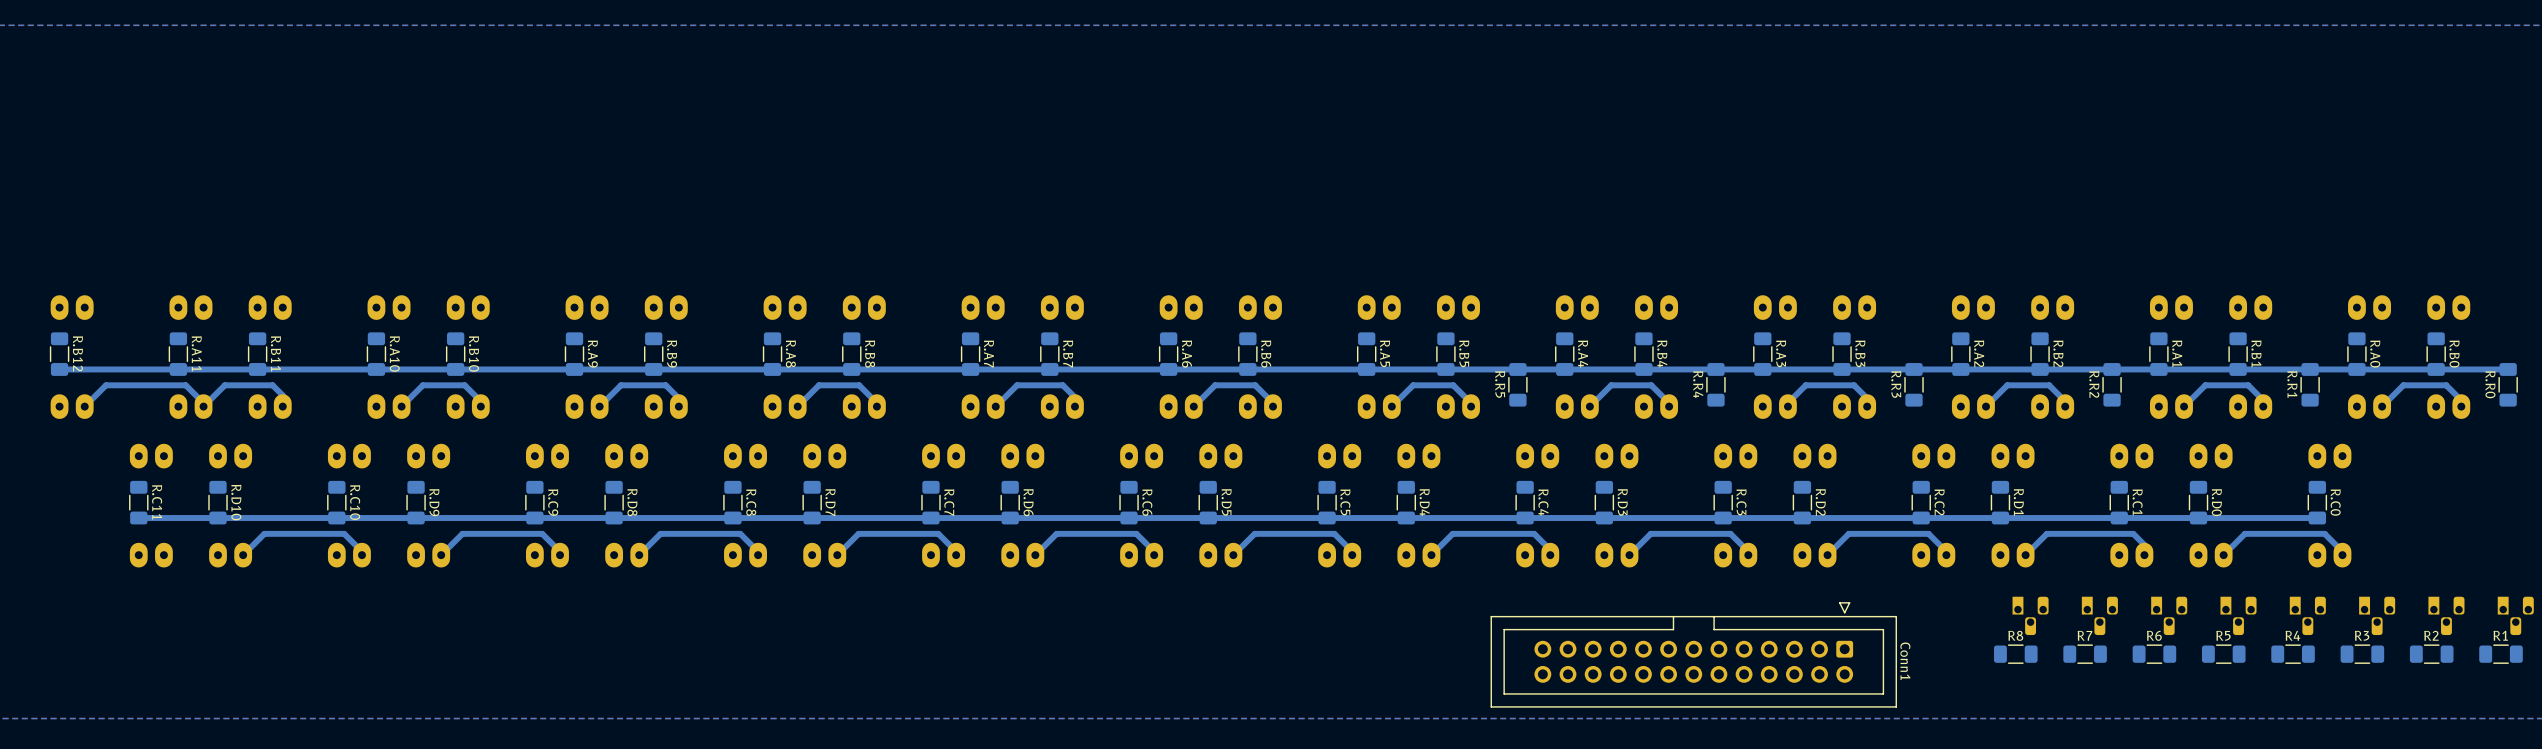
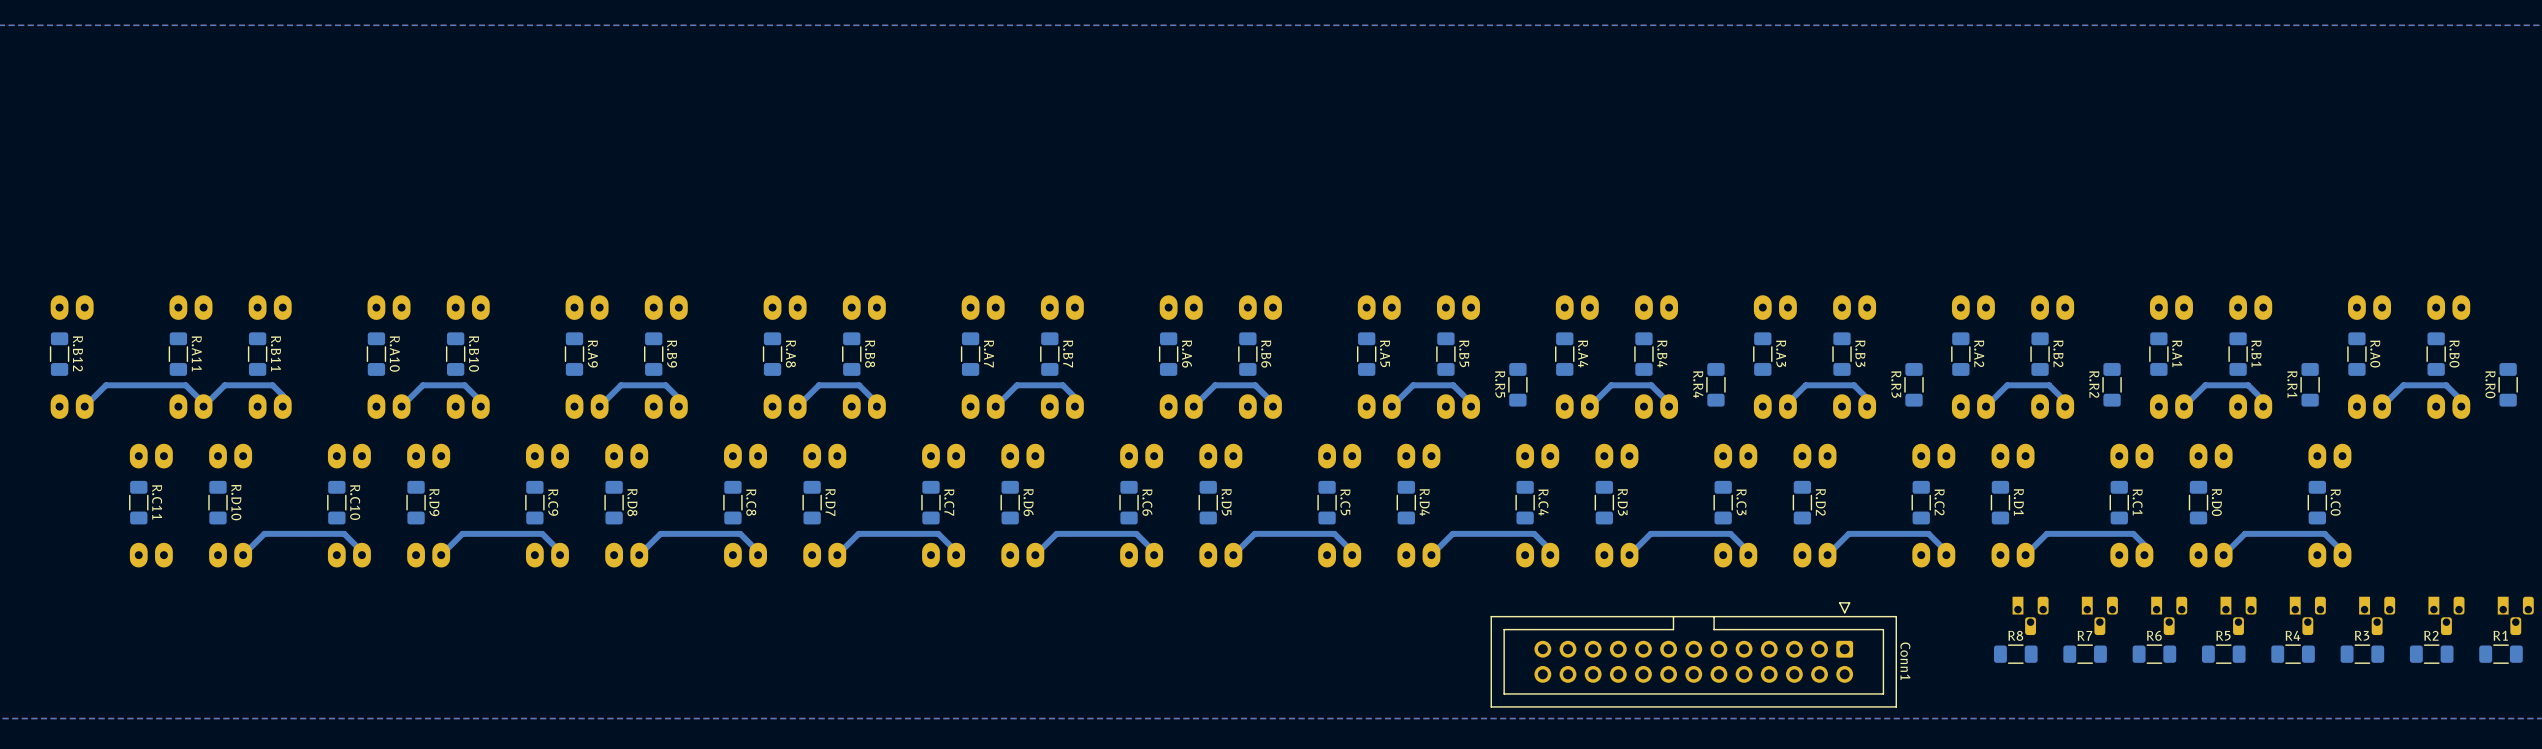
bottom track: (2508, 369) (59, 369) -> none
bottom track: (2317, 518) (138, 518) -> none

